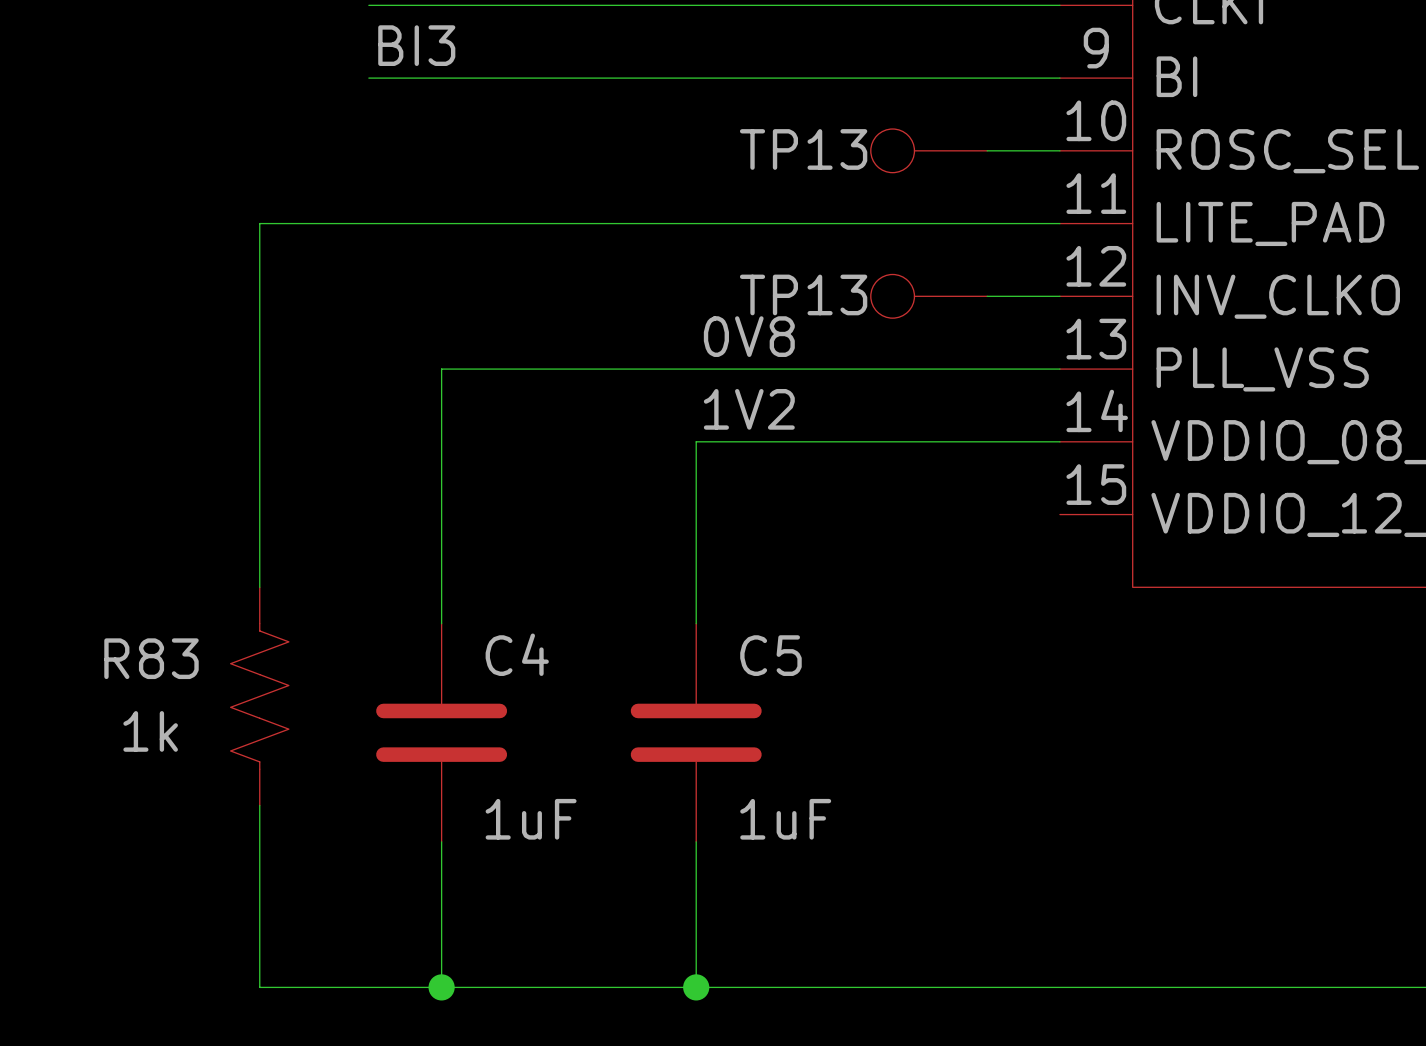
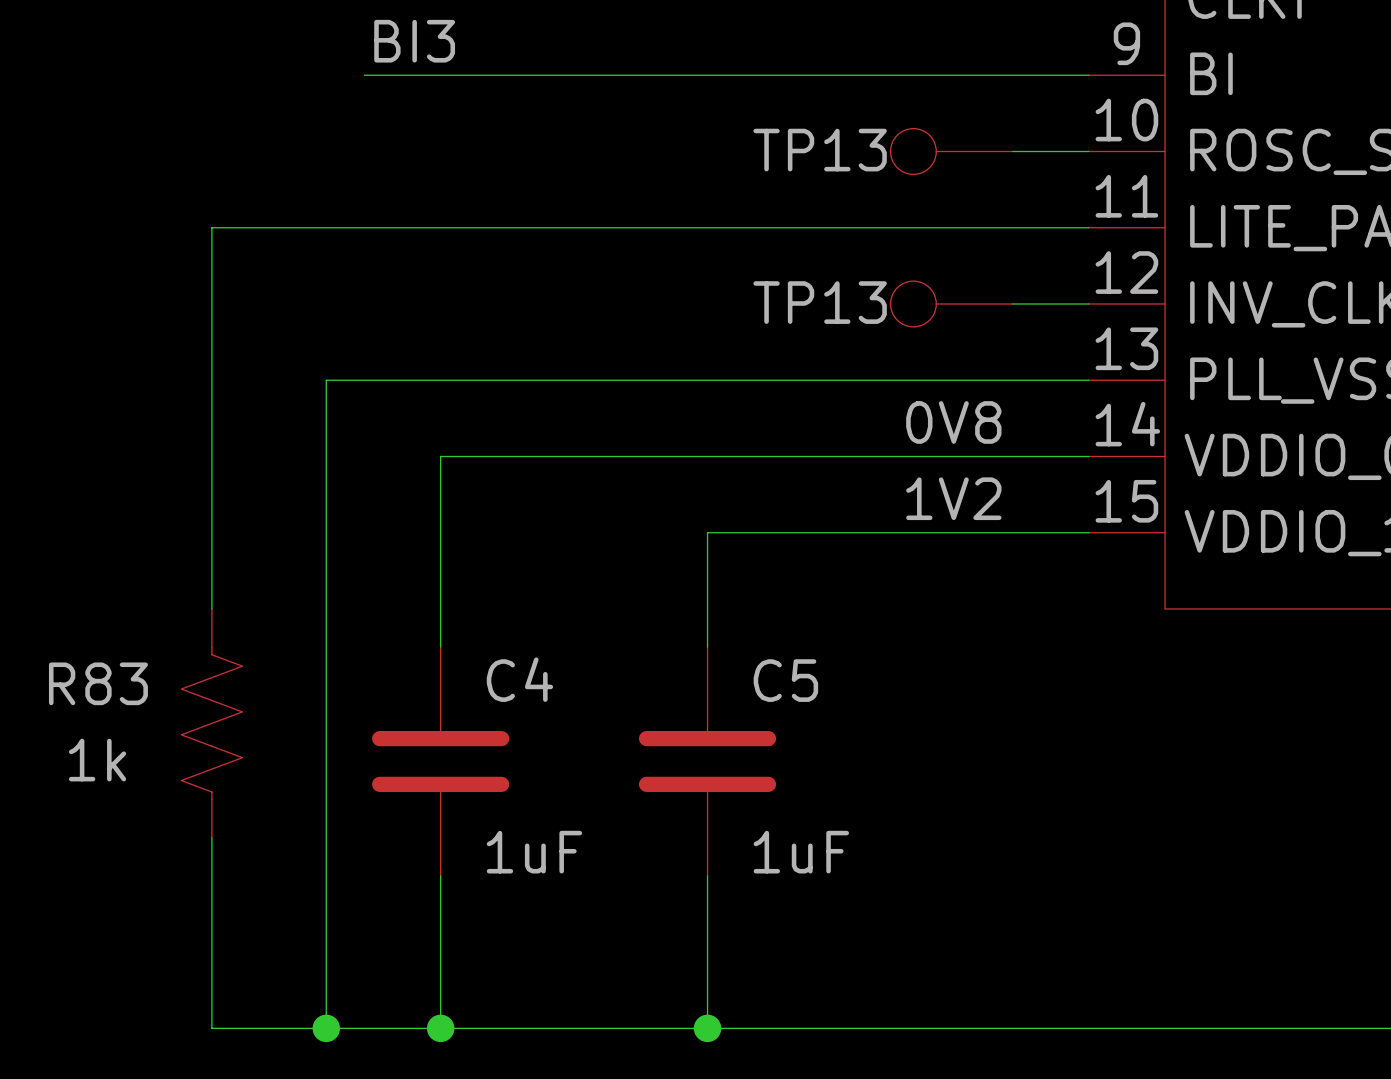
wire: (259, 223) (259, 587) -> (250, 227) (211, 227) (211, 608)
label position: 0V8 (749, 336) -> 0V8 (953, 422)
wire: (441, 369) (441, 441) -> (707, 456) (440, 456)
wire: none -> (440, 380) (326, 380) (326, 1028)
label position: 1V2 (749, 409) -> 1V2 (953, 498)
wire: (696, 441) (696, 514) -> (1088, 532) (707, 532)
R83 position: (259, 696) -> (211, 723)
wire: (259, 805) (259, 987) -> (211, 837) (211, 1028) (250, 1028)
junction: none -> (326, 1028)

